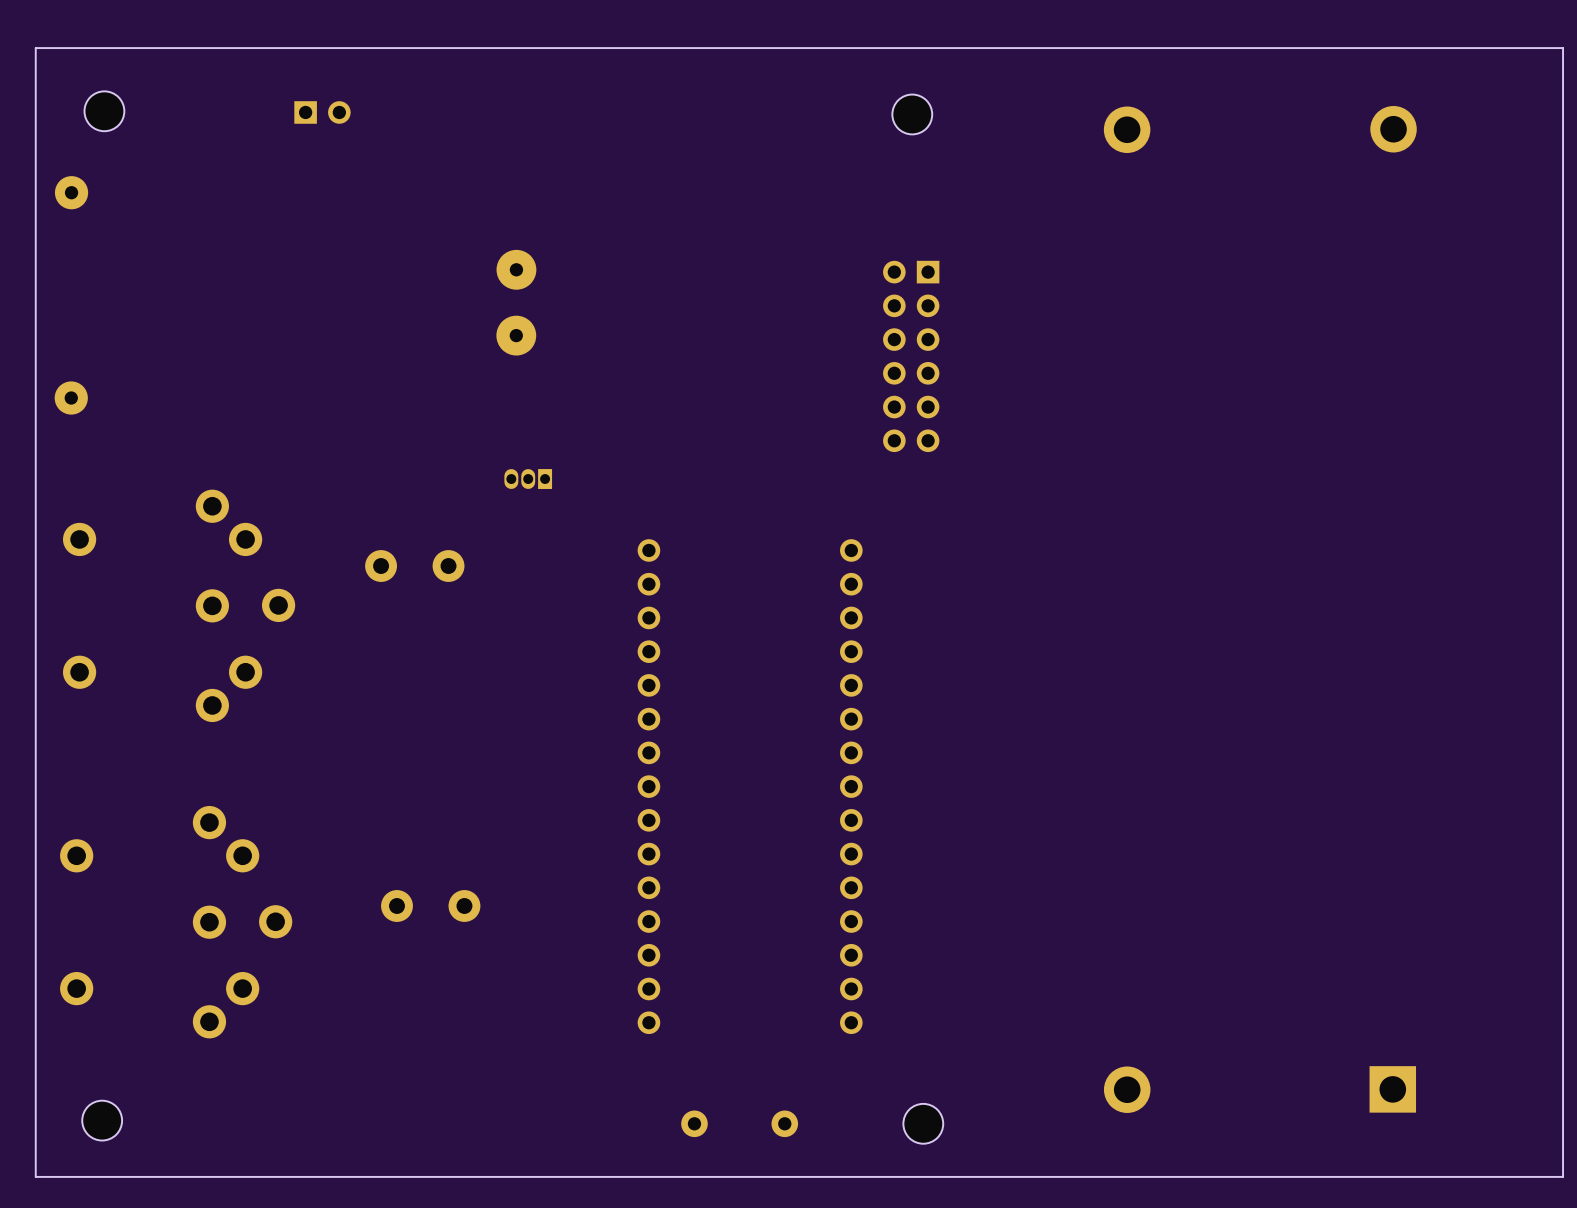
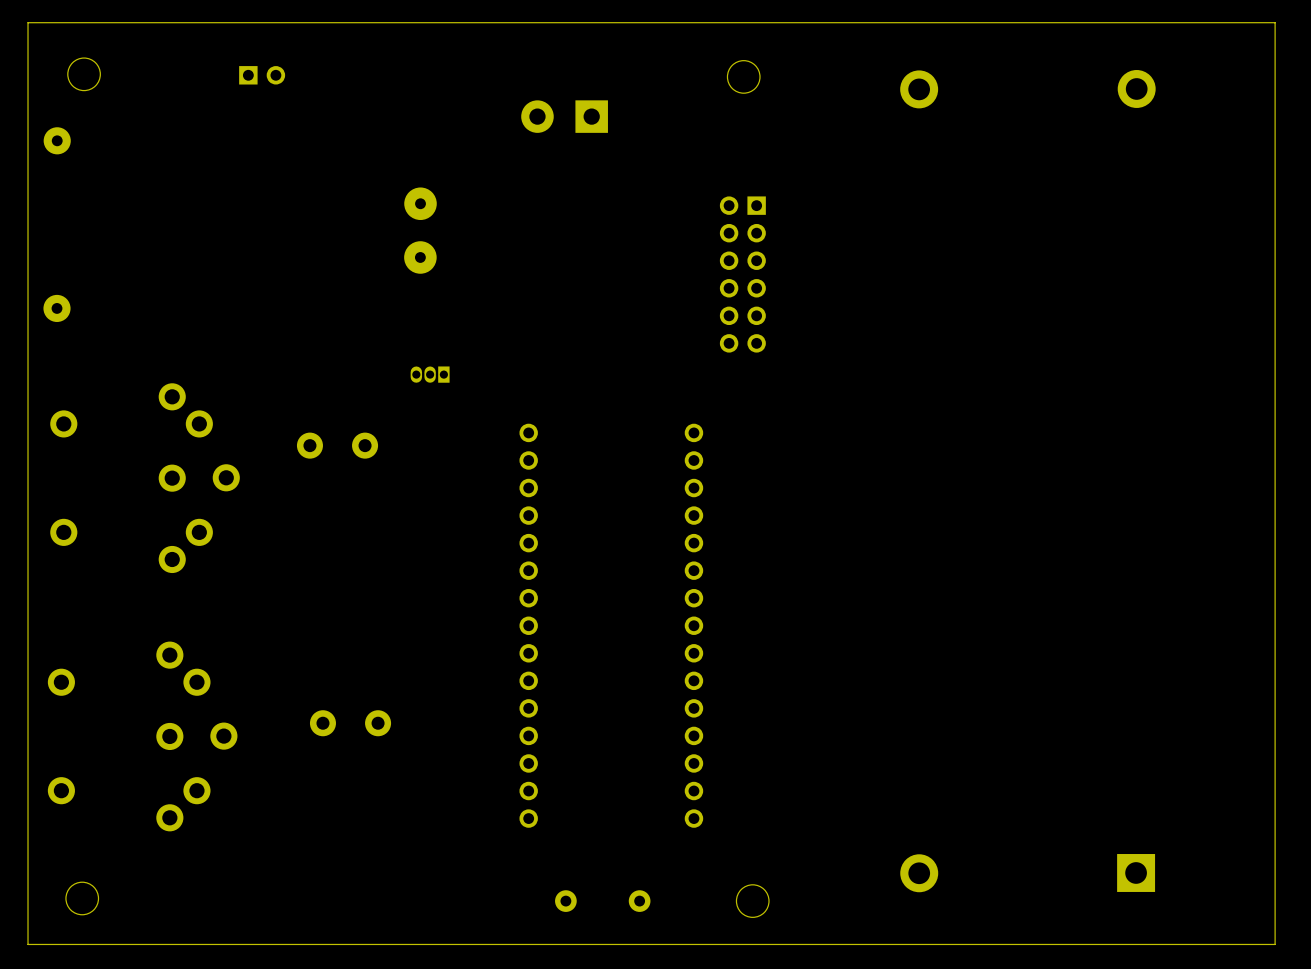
part: none -> (564, 116)

